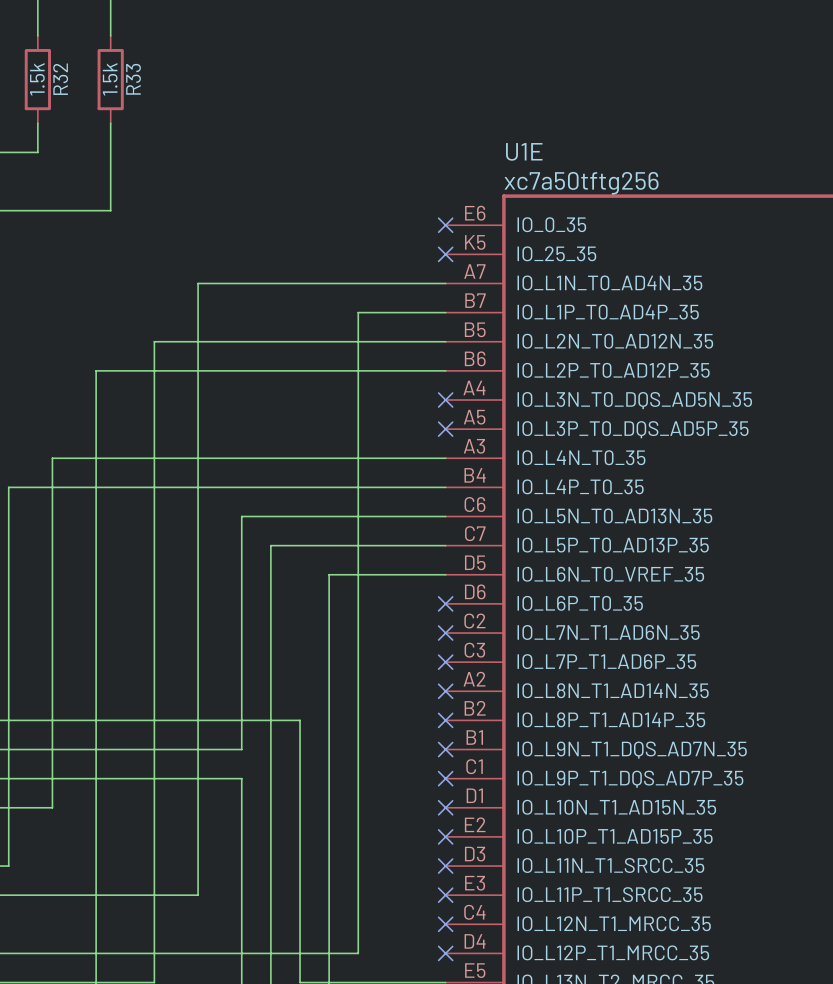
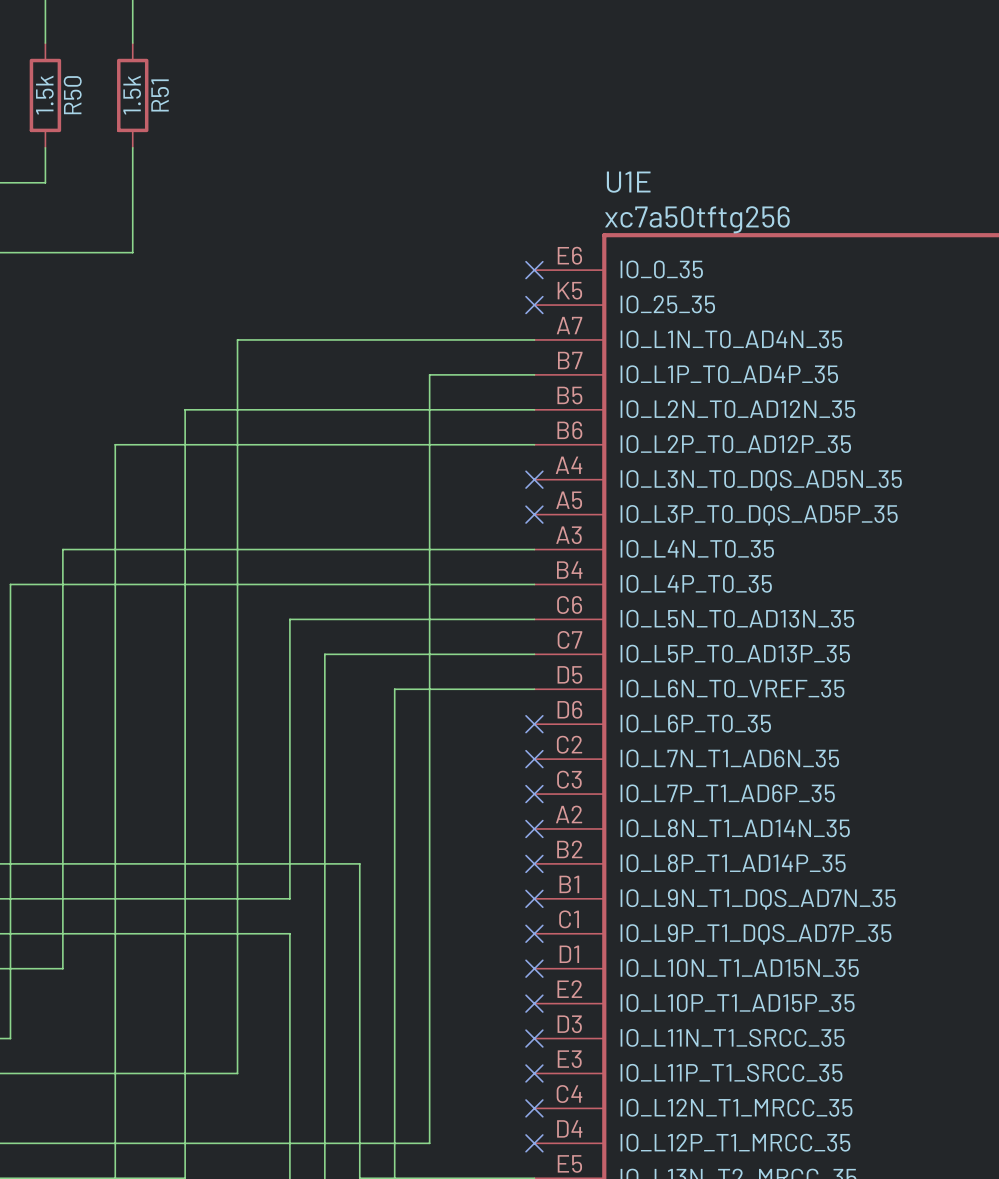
R32 name: R32 (60, 79) -> R50 (72, 95)
R33 name: R33 (133, 79) -> R51 (160, 95)

